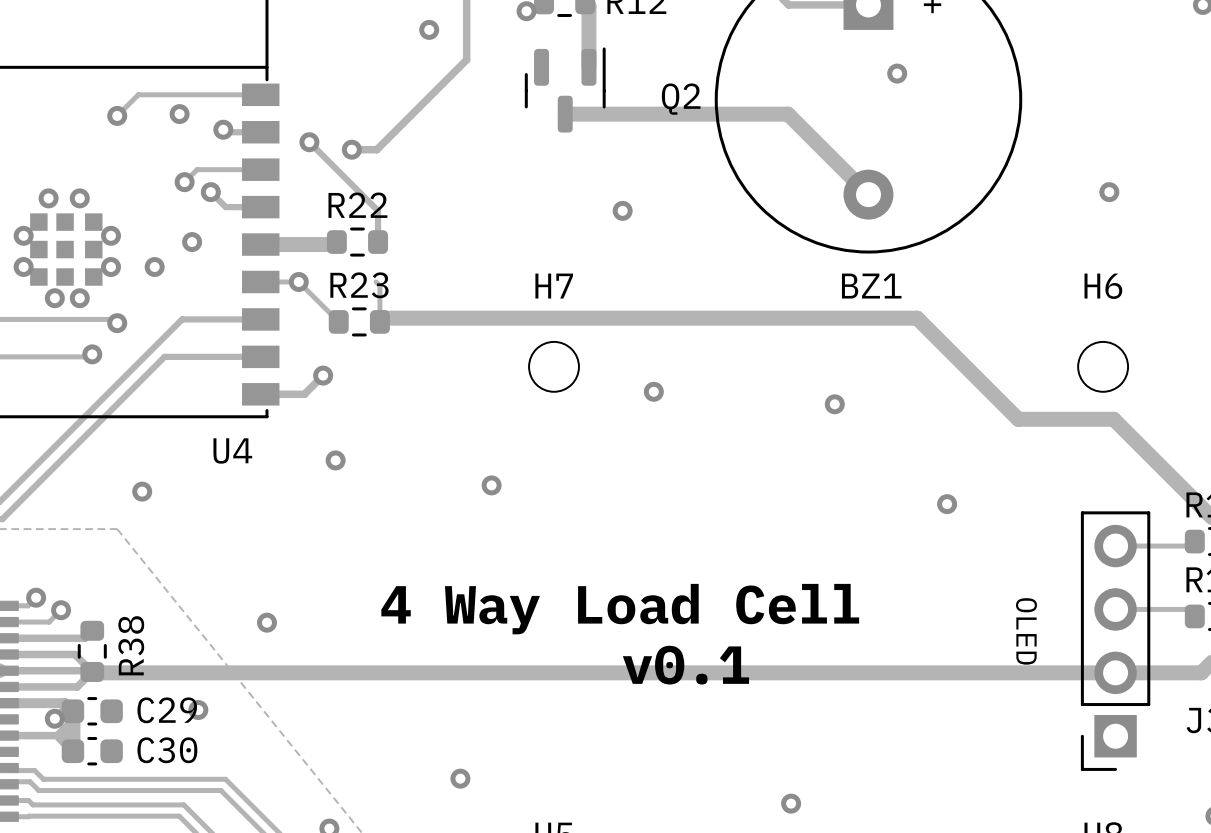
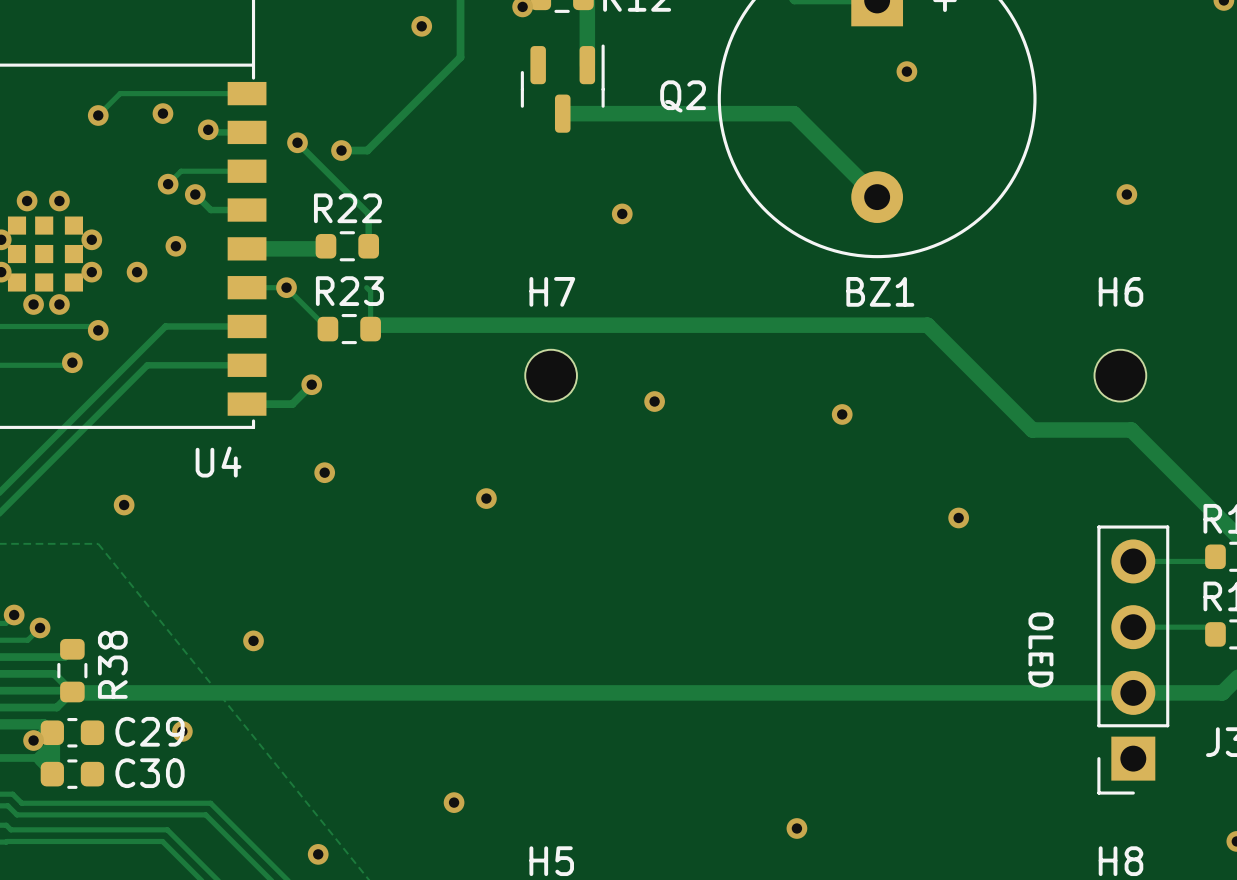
text: 4 Way Load Cell (620, 609) -> none
text: v0.1 (685, 665) -> none

